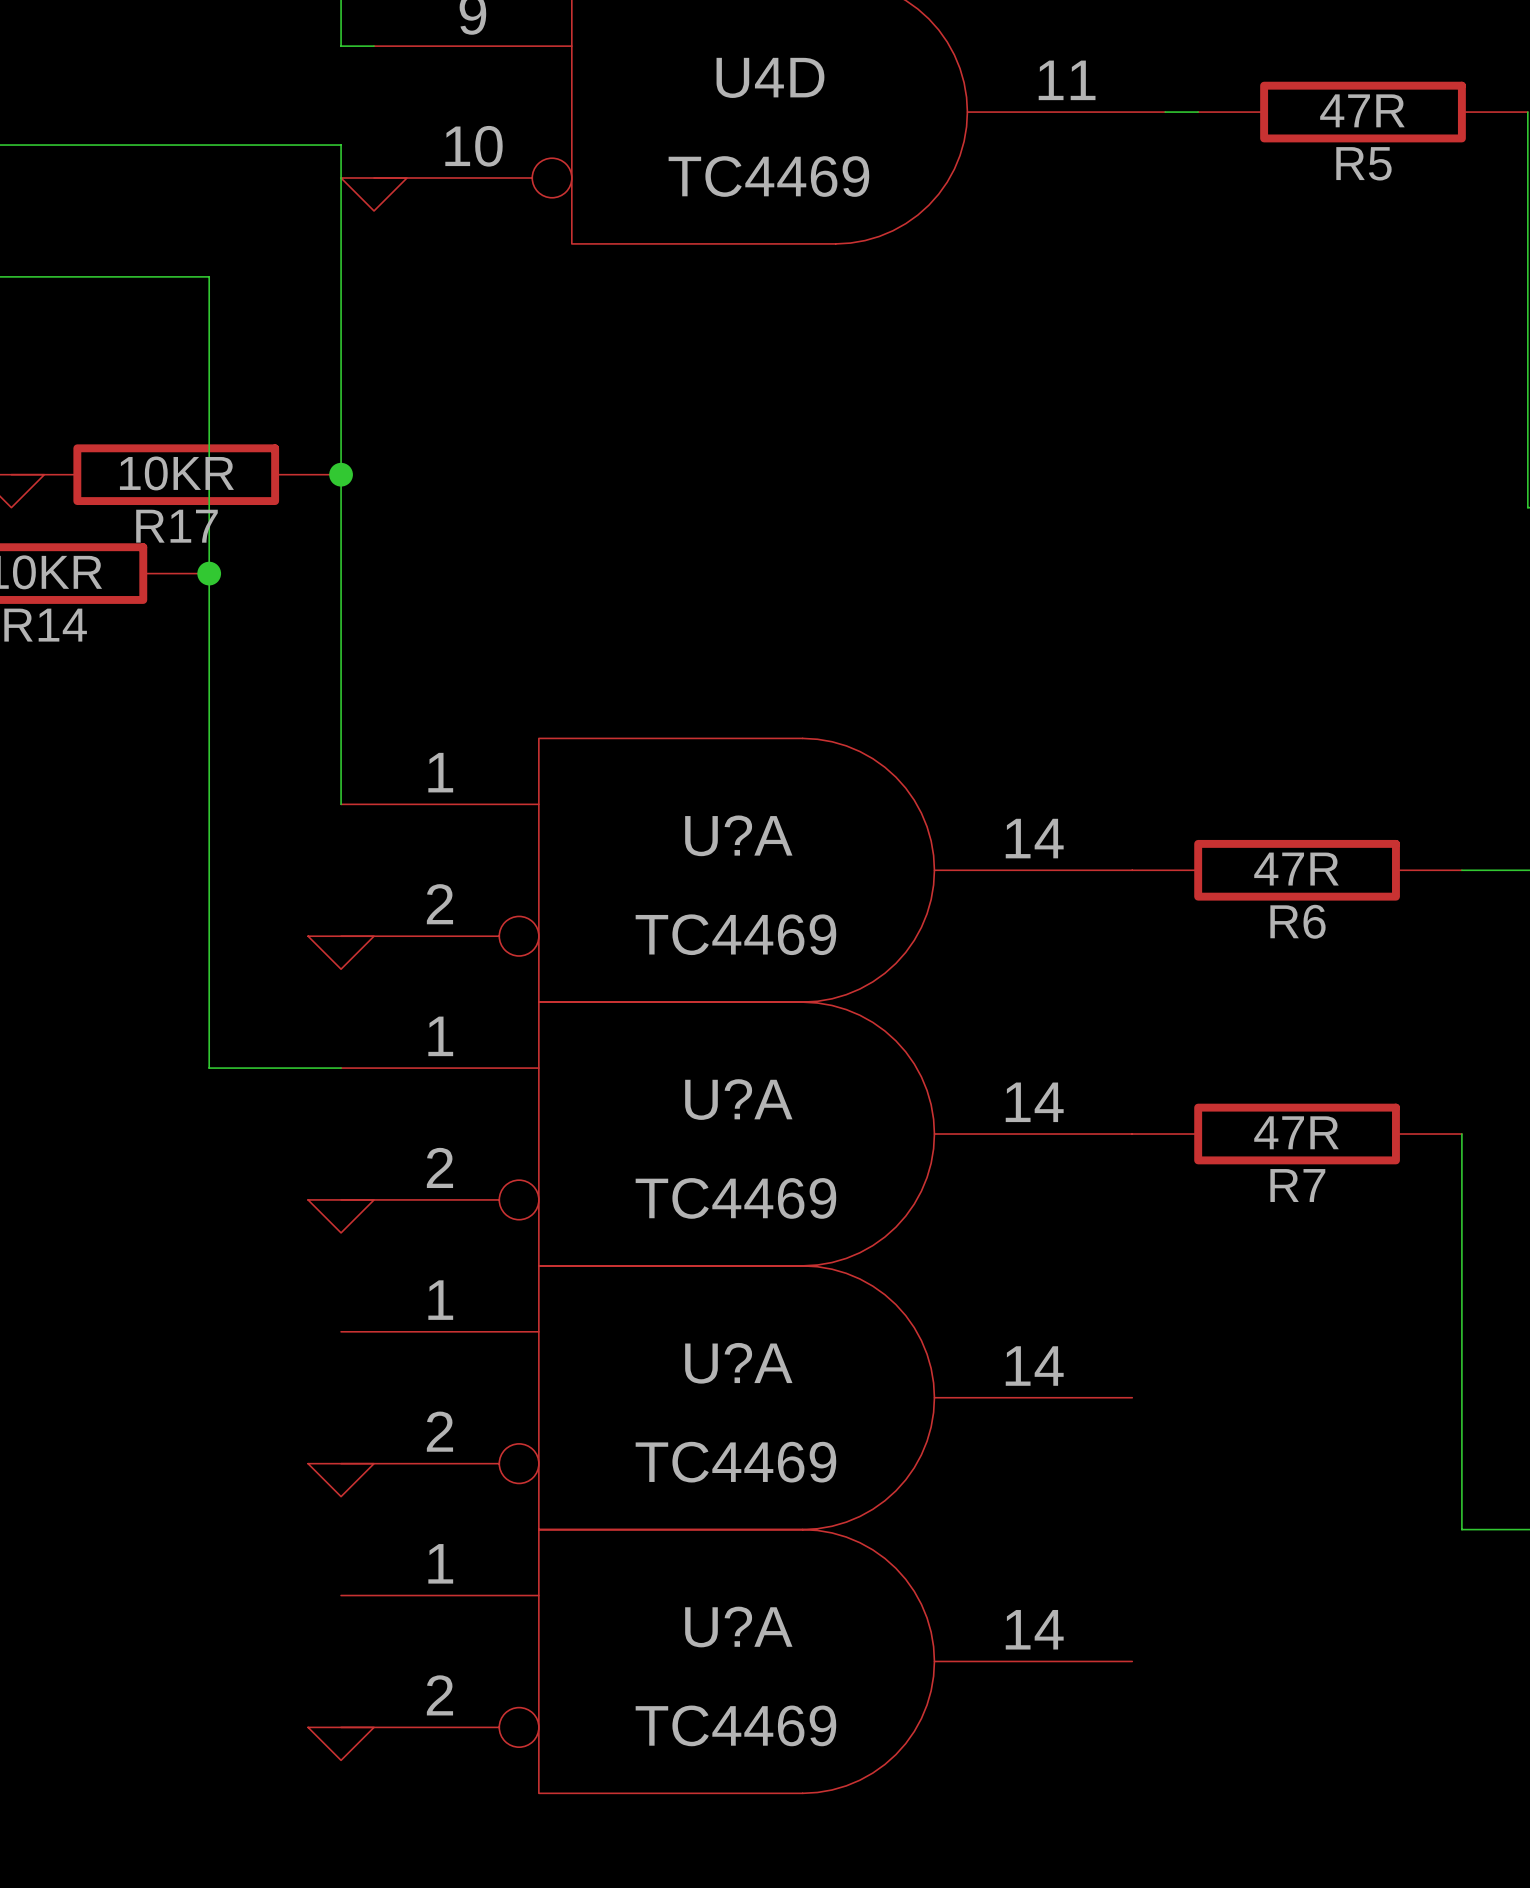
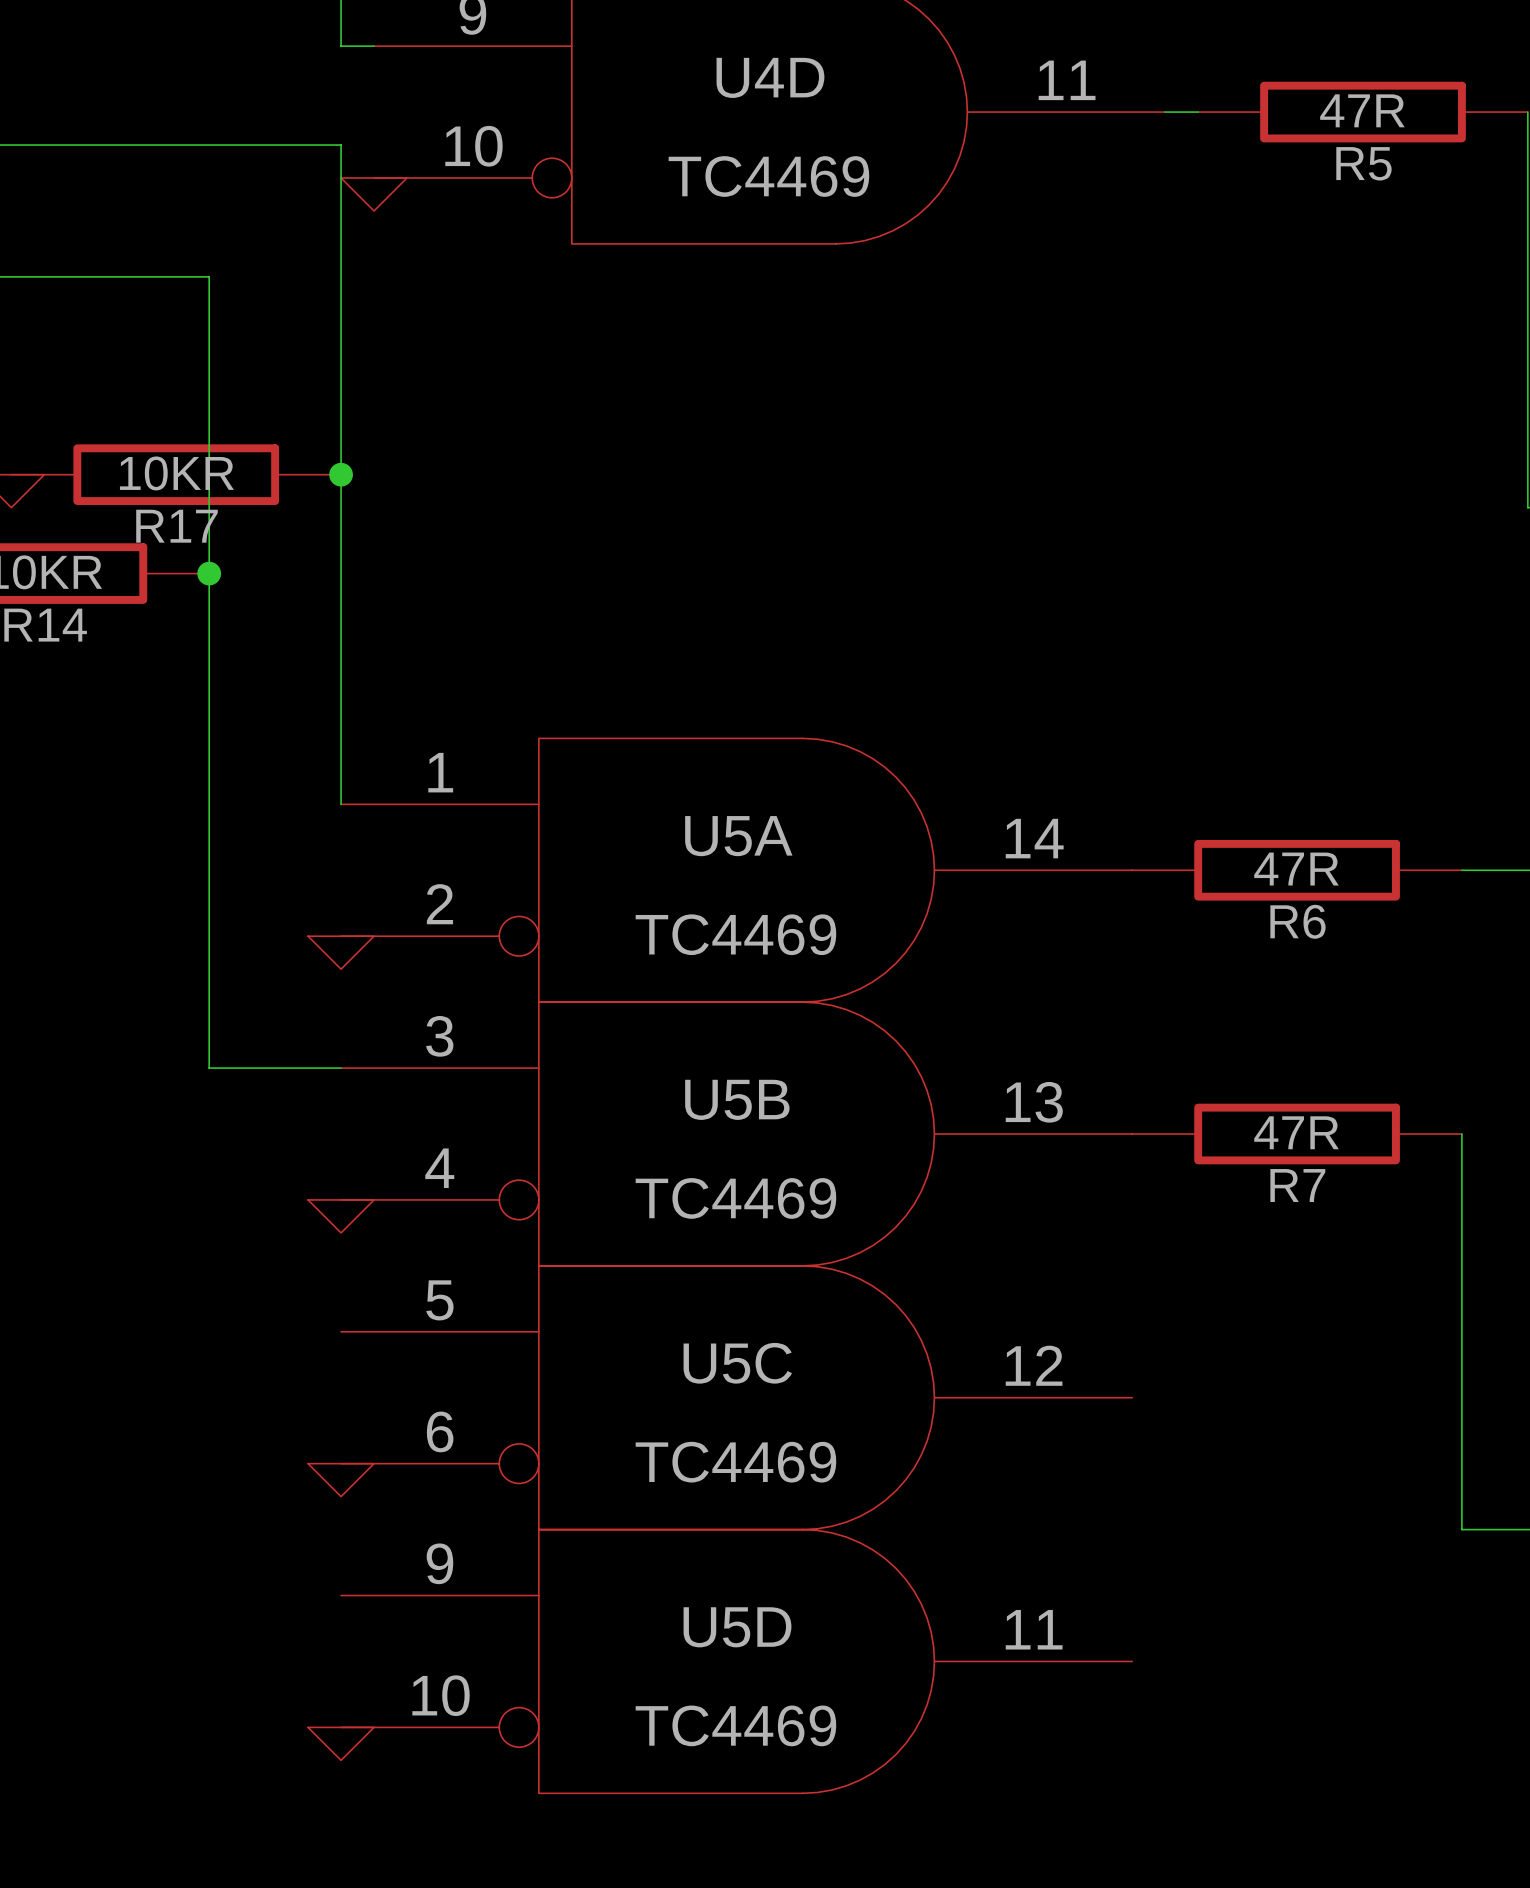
U?A name: U?A (738, 835) -> U5A (738, 836)
U?A pin number: 1 (440, 1036) -> 3 (439, 1036)
U?A name: U?A (738, 1099) -> U5B (737, 1099)
U?A pin number: 14 (1034, 1102) -> 13 (1034, 1102)
U?A pin number: 2 (439, 1167) -> 4 (439, 1168)
U?A pin number: 1 (440, 1300) -> 5 (439, 1300)
U?A name: U?A (738, 1363) -> U5C (737, 1363)
U?A pin number: 14 (1034, 1366) -> 12 (1034, 1365)
U?A pin number: 2 (439, 1431) -> 6 (440, 1431)
U?A pin number: 1 (440, 1563) -> 9 (439, 1563)
U?A name: U?A (738, 1627) -> U5D (737, 1627)
U?A pin number: 14 (1034, 1629) -> 11 (1034, 1629)
U?A pin number: 2 (439, 1695) -> 10 (441, 1695)

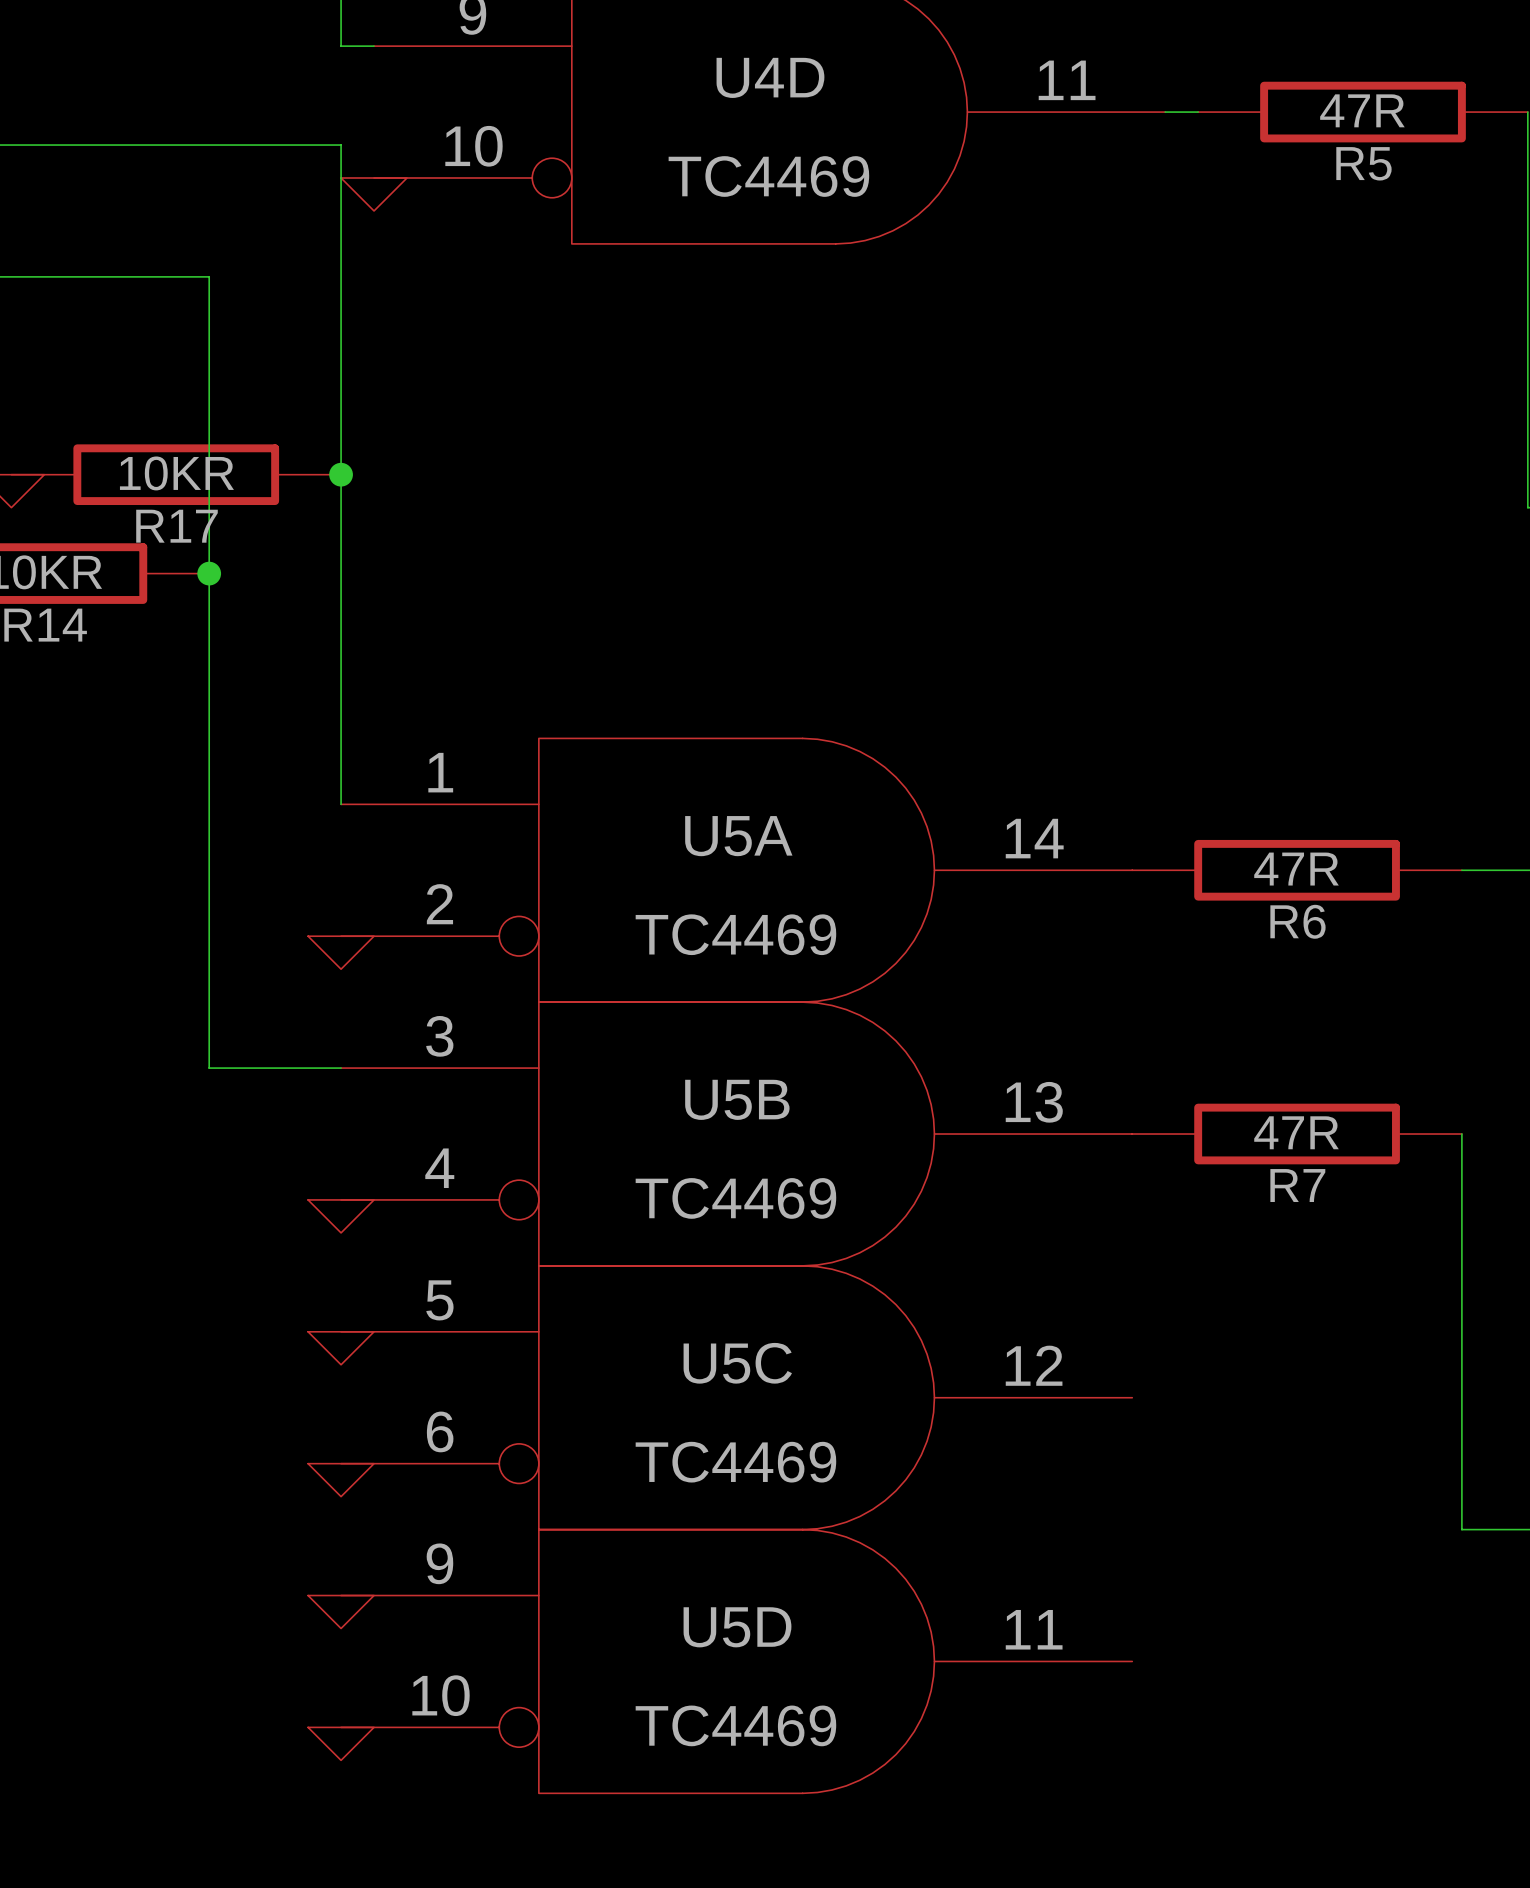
power symbol: none -> (341, 1348)
power symbol: none -> (341, 1612)

